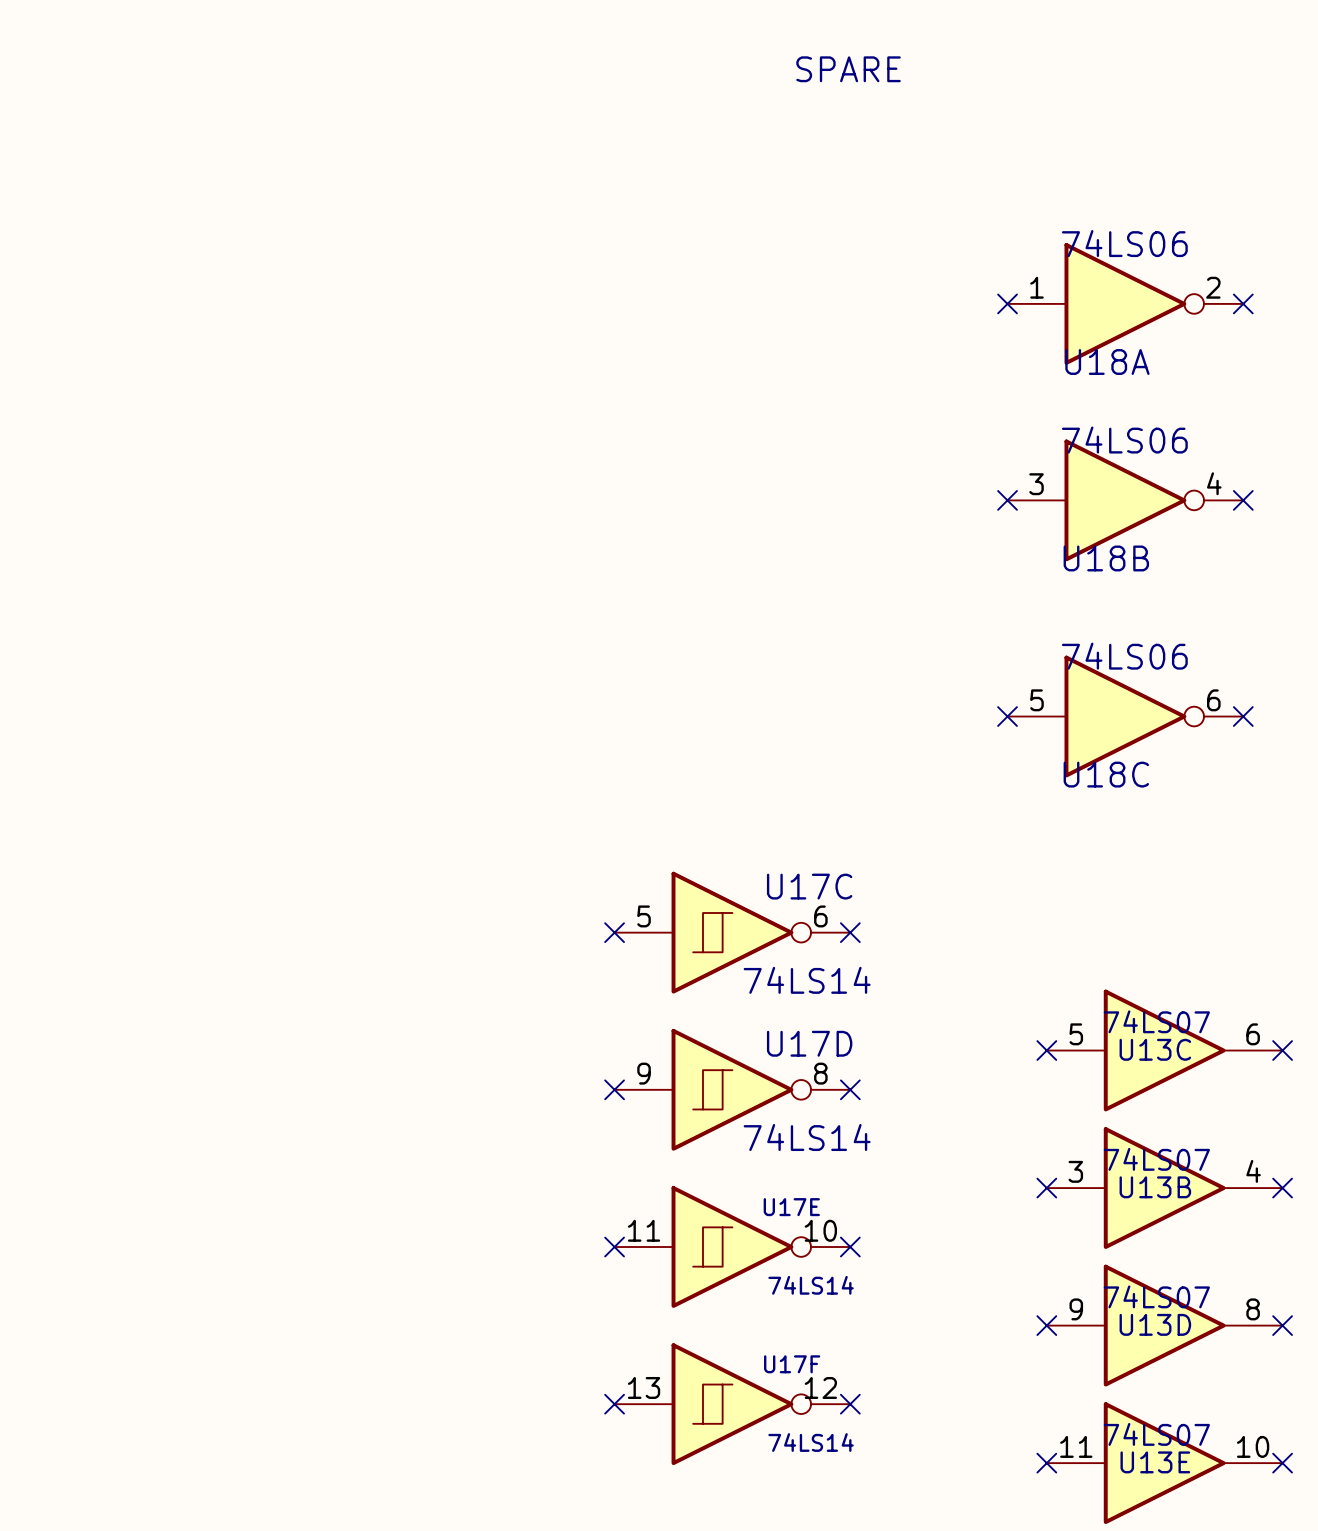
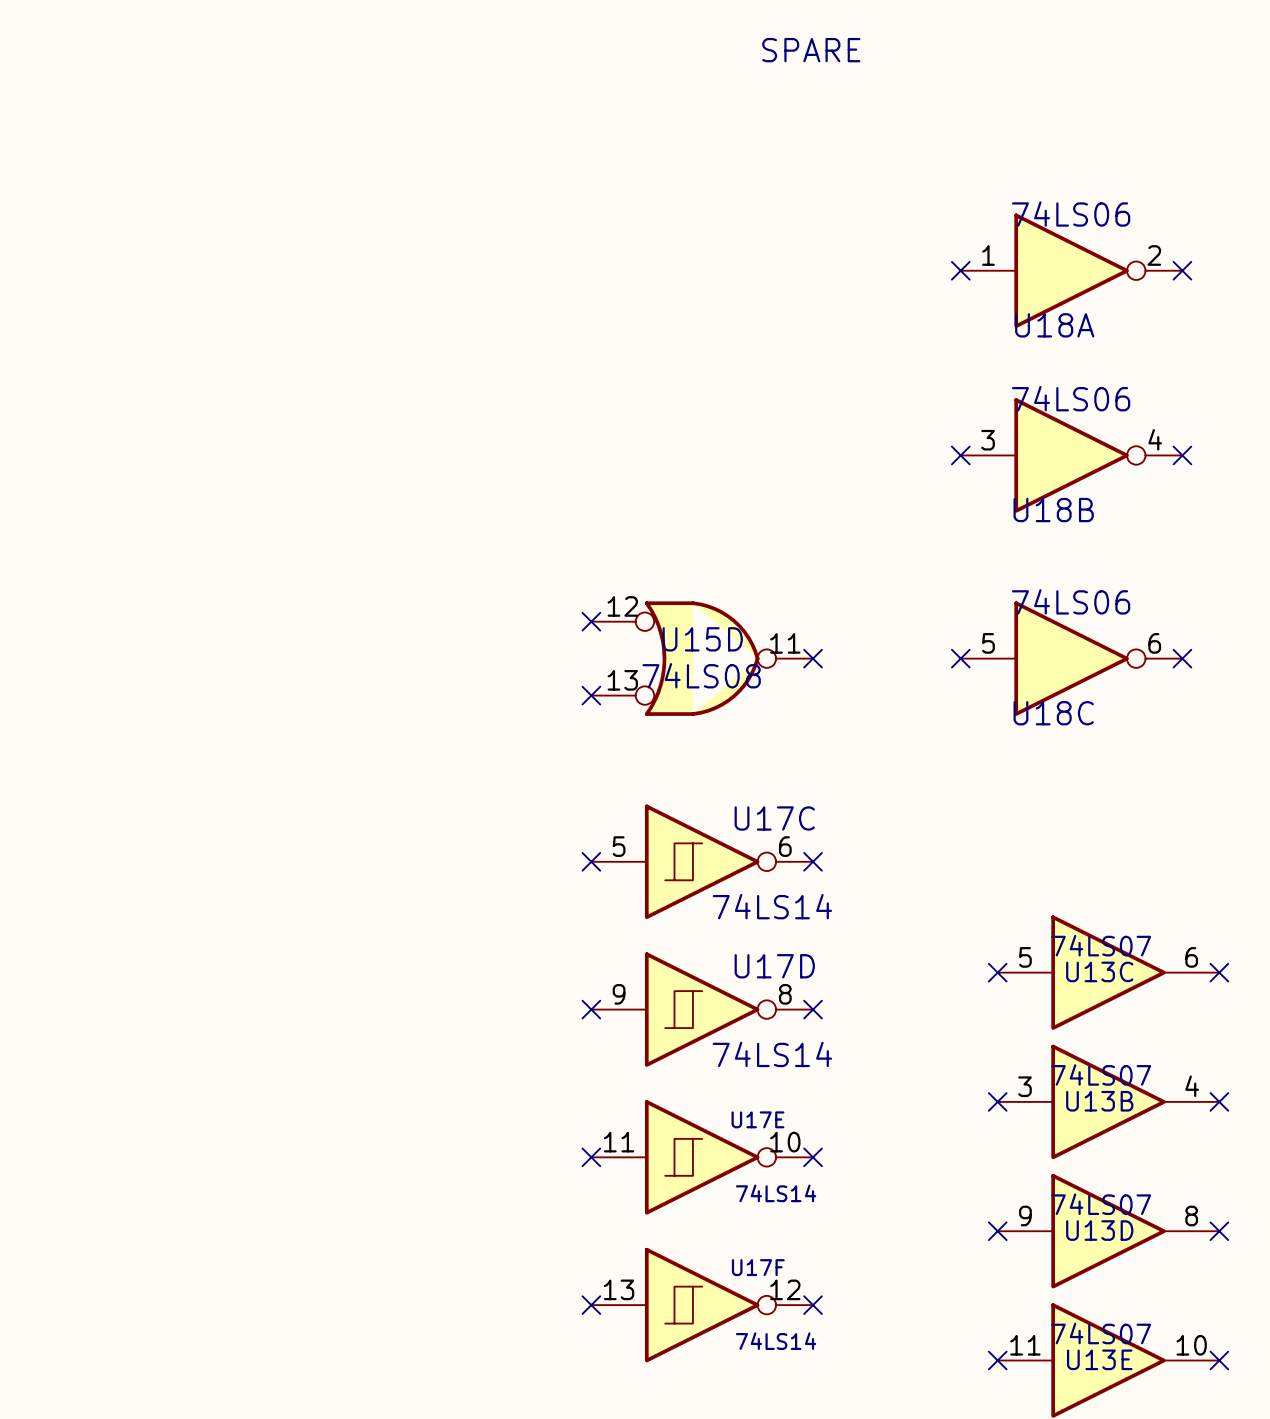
no-connect mark: none -> (591, 621)
U15D: none -> 74LS08 (702, 658)
no-connect mark: none -> (813, 658)
no-connect mark: none -> (591, 695)

